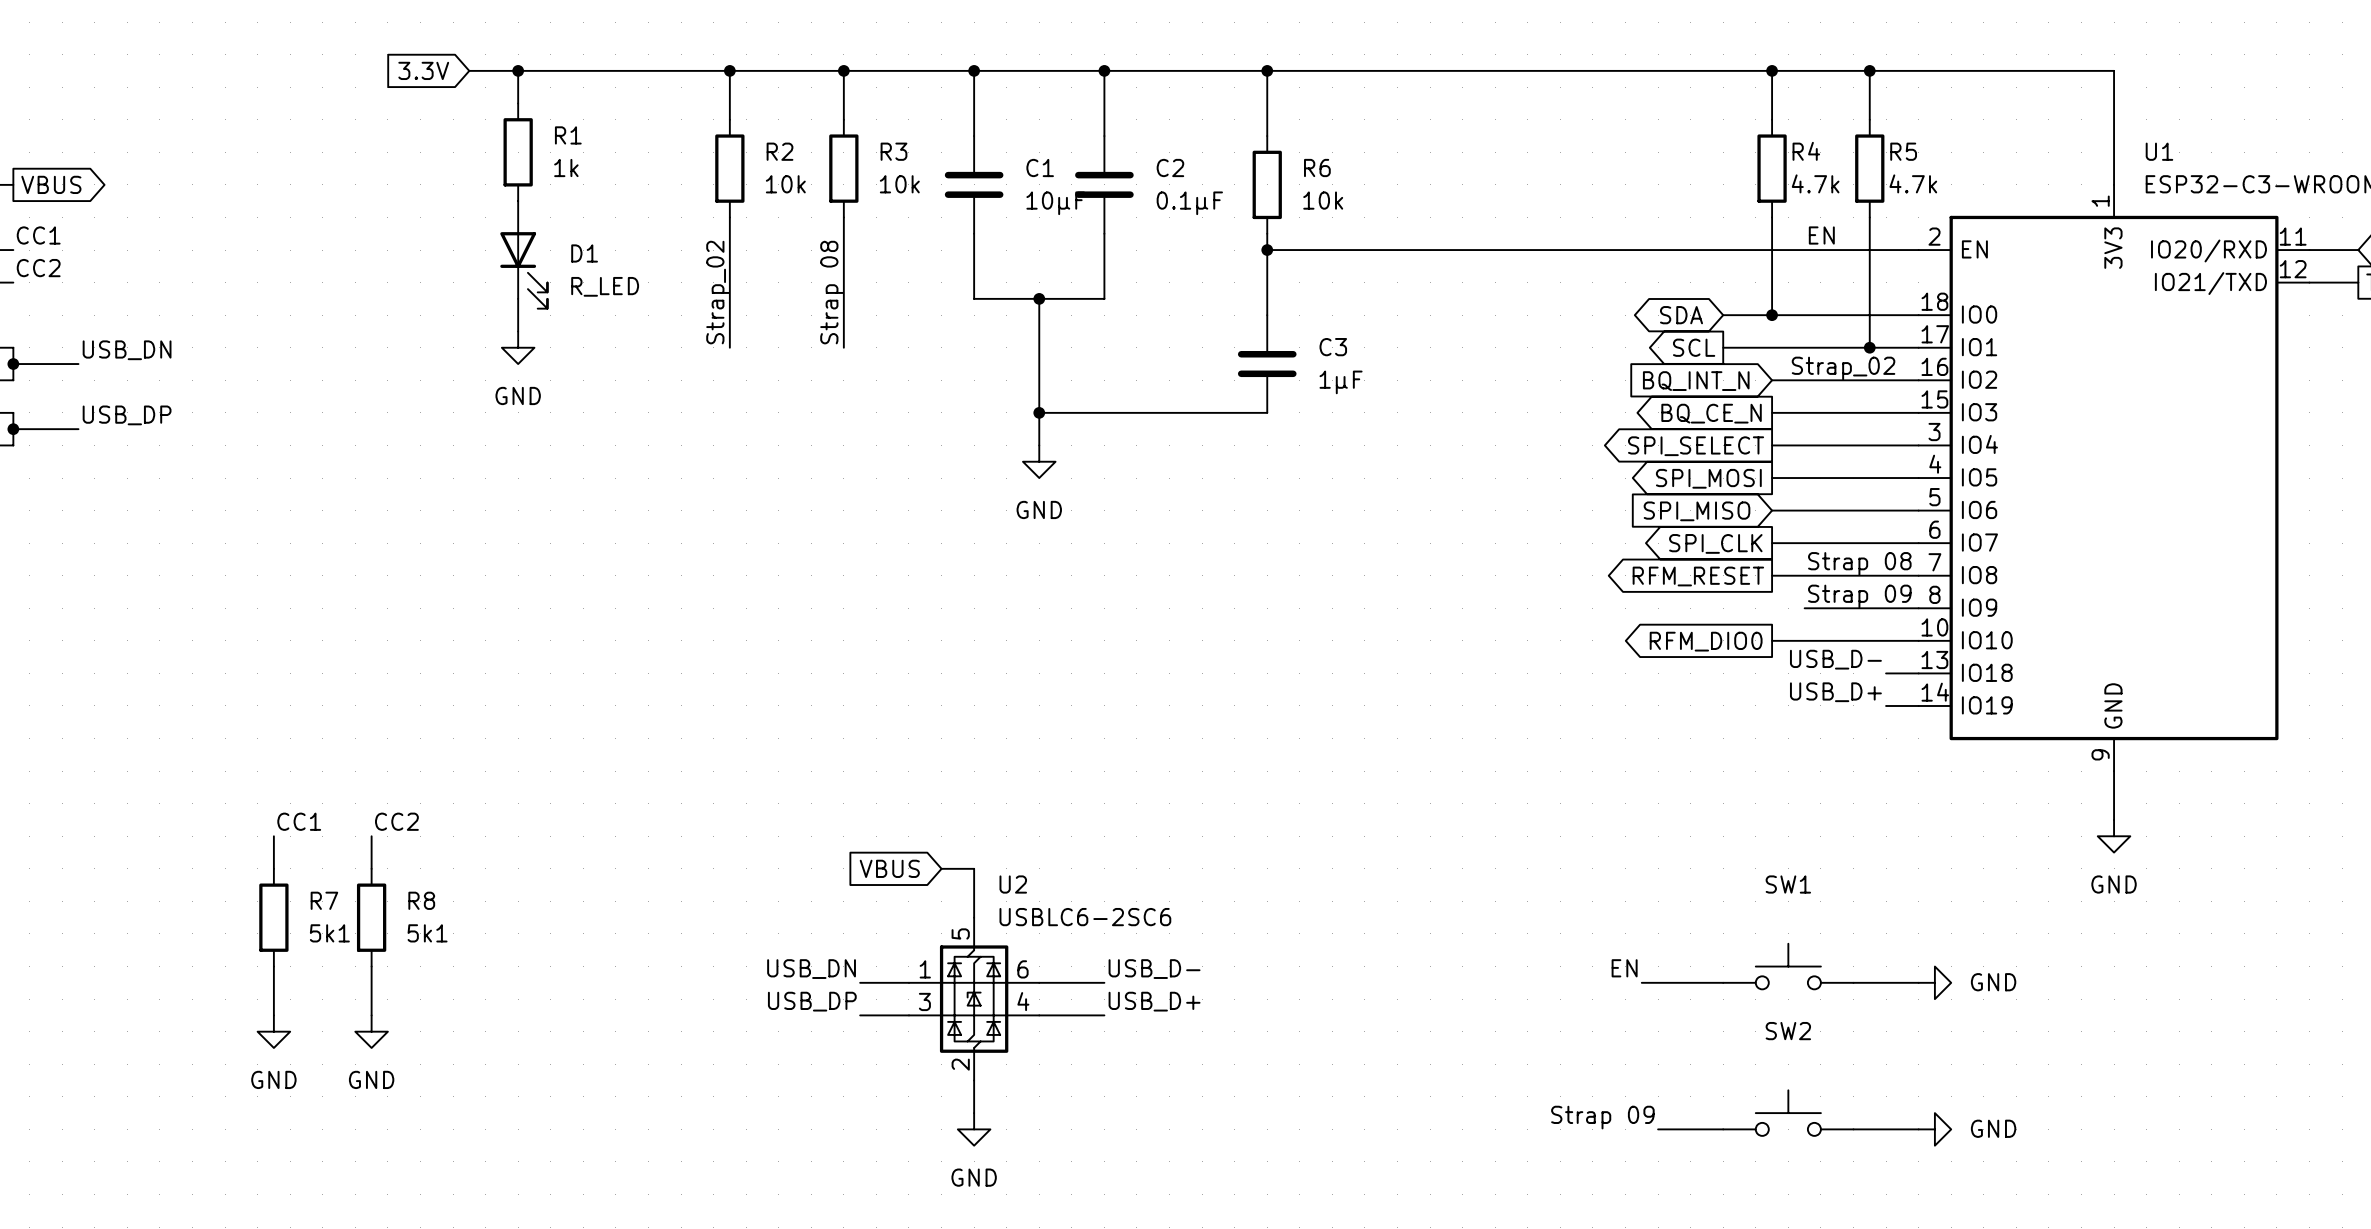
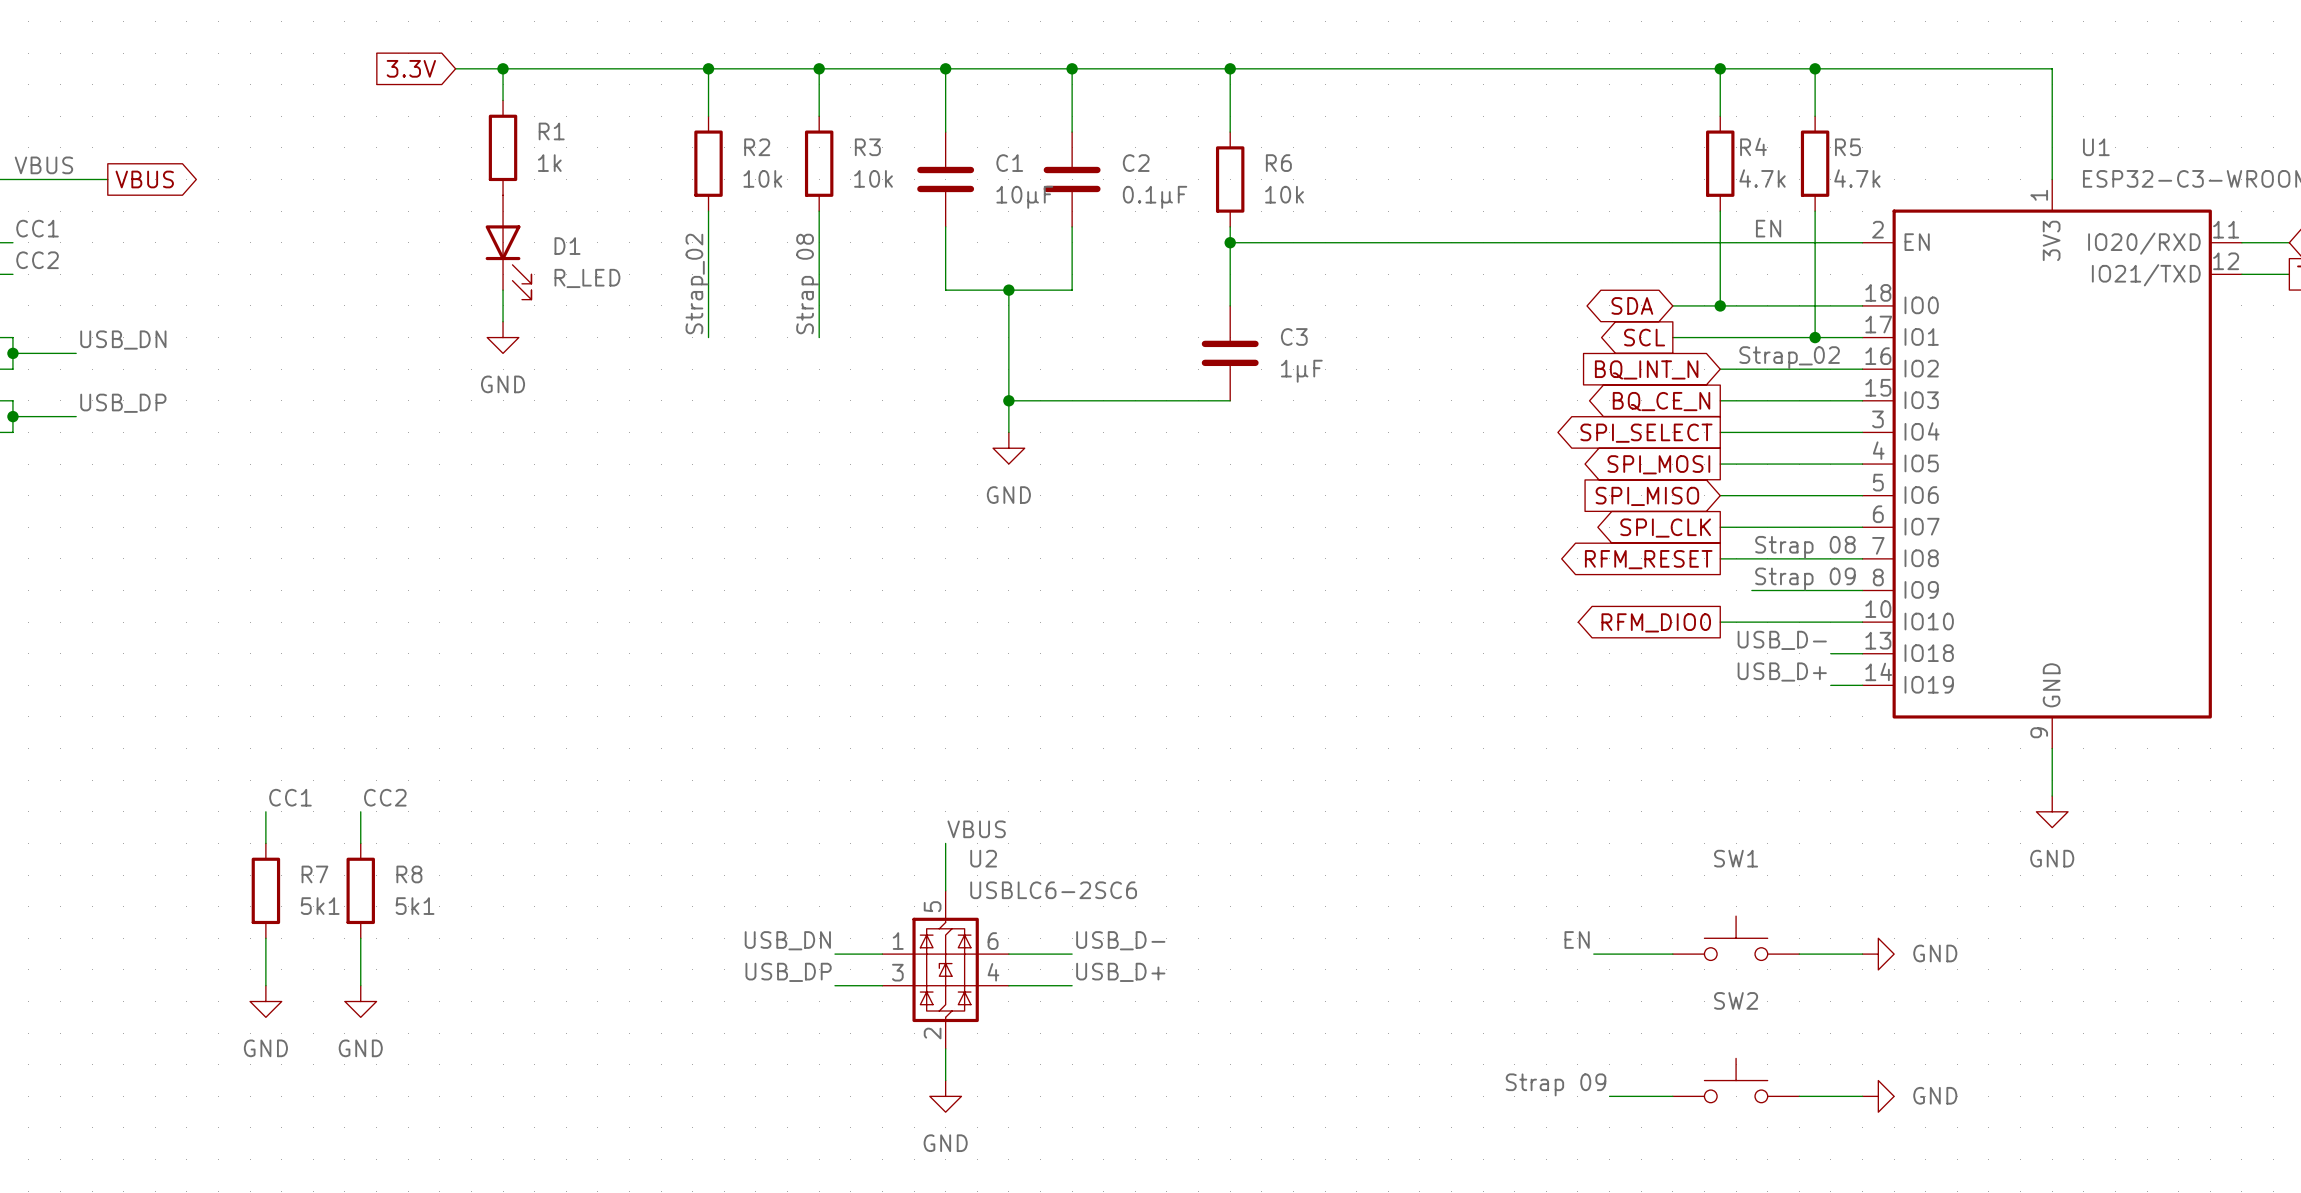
label: none -> VBUS (43, 165)
wire: none -> (12, 179) (107, 179)
global label position: VBUS (51, 184) -> VBUS (144, 179)
label: none -> VBUS (976, 829)
global label: VBUS (889, 868) -> none
wire: (941, 868) (974, 868) -> none

